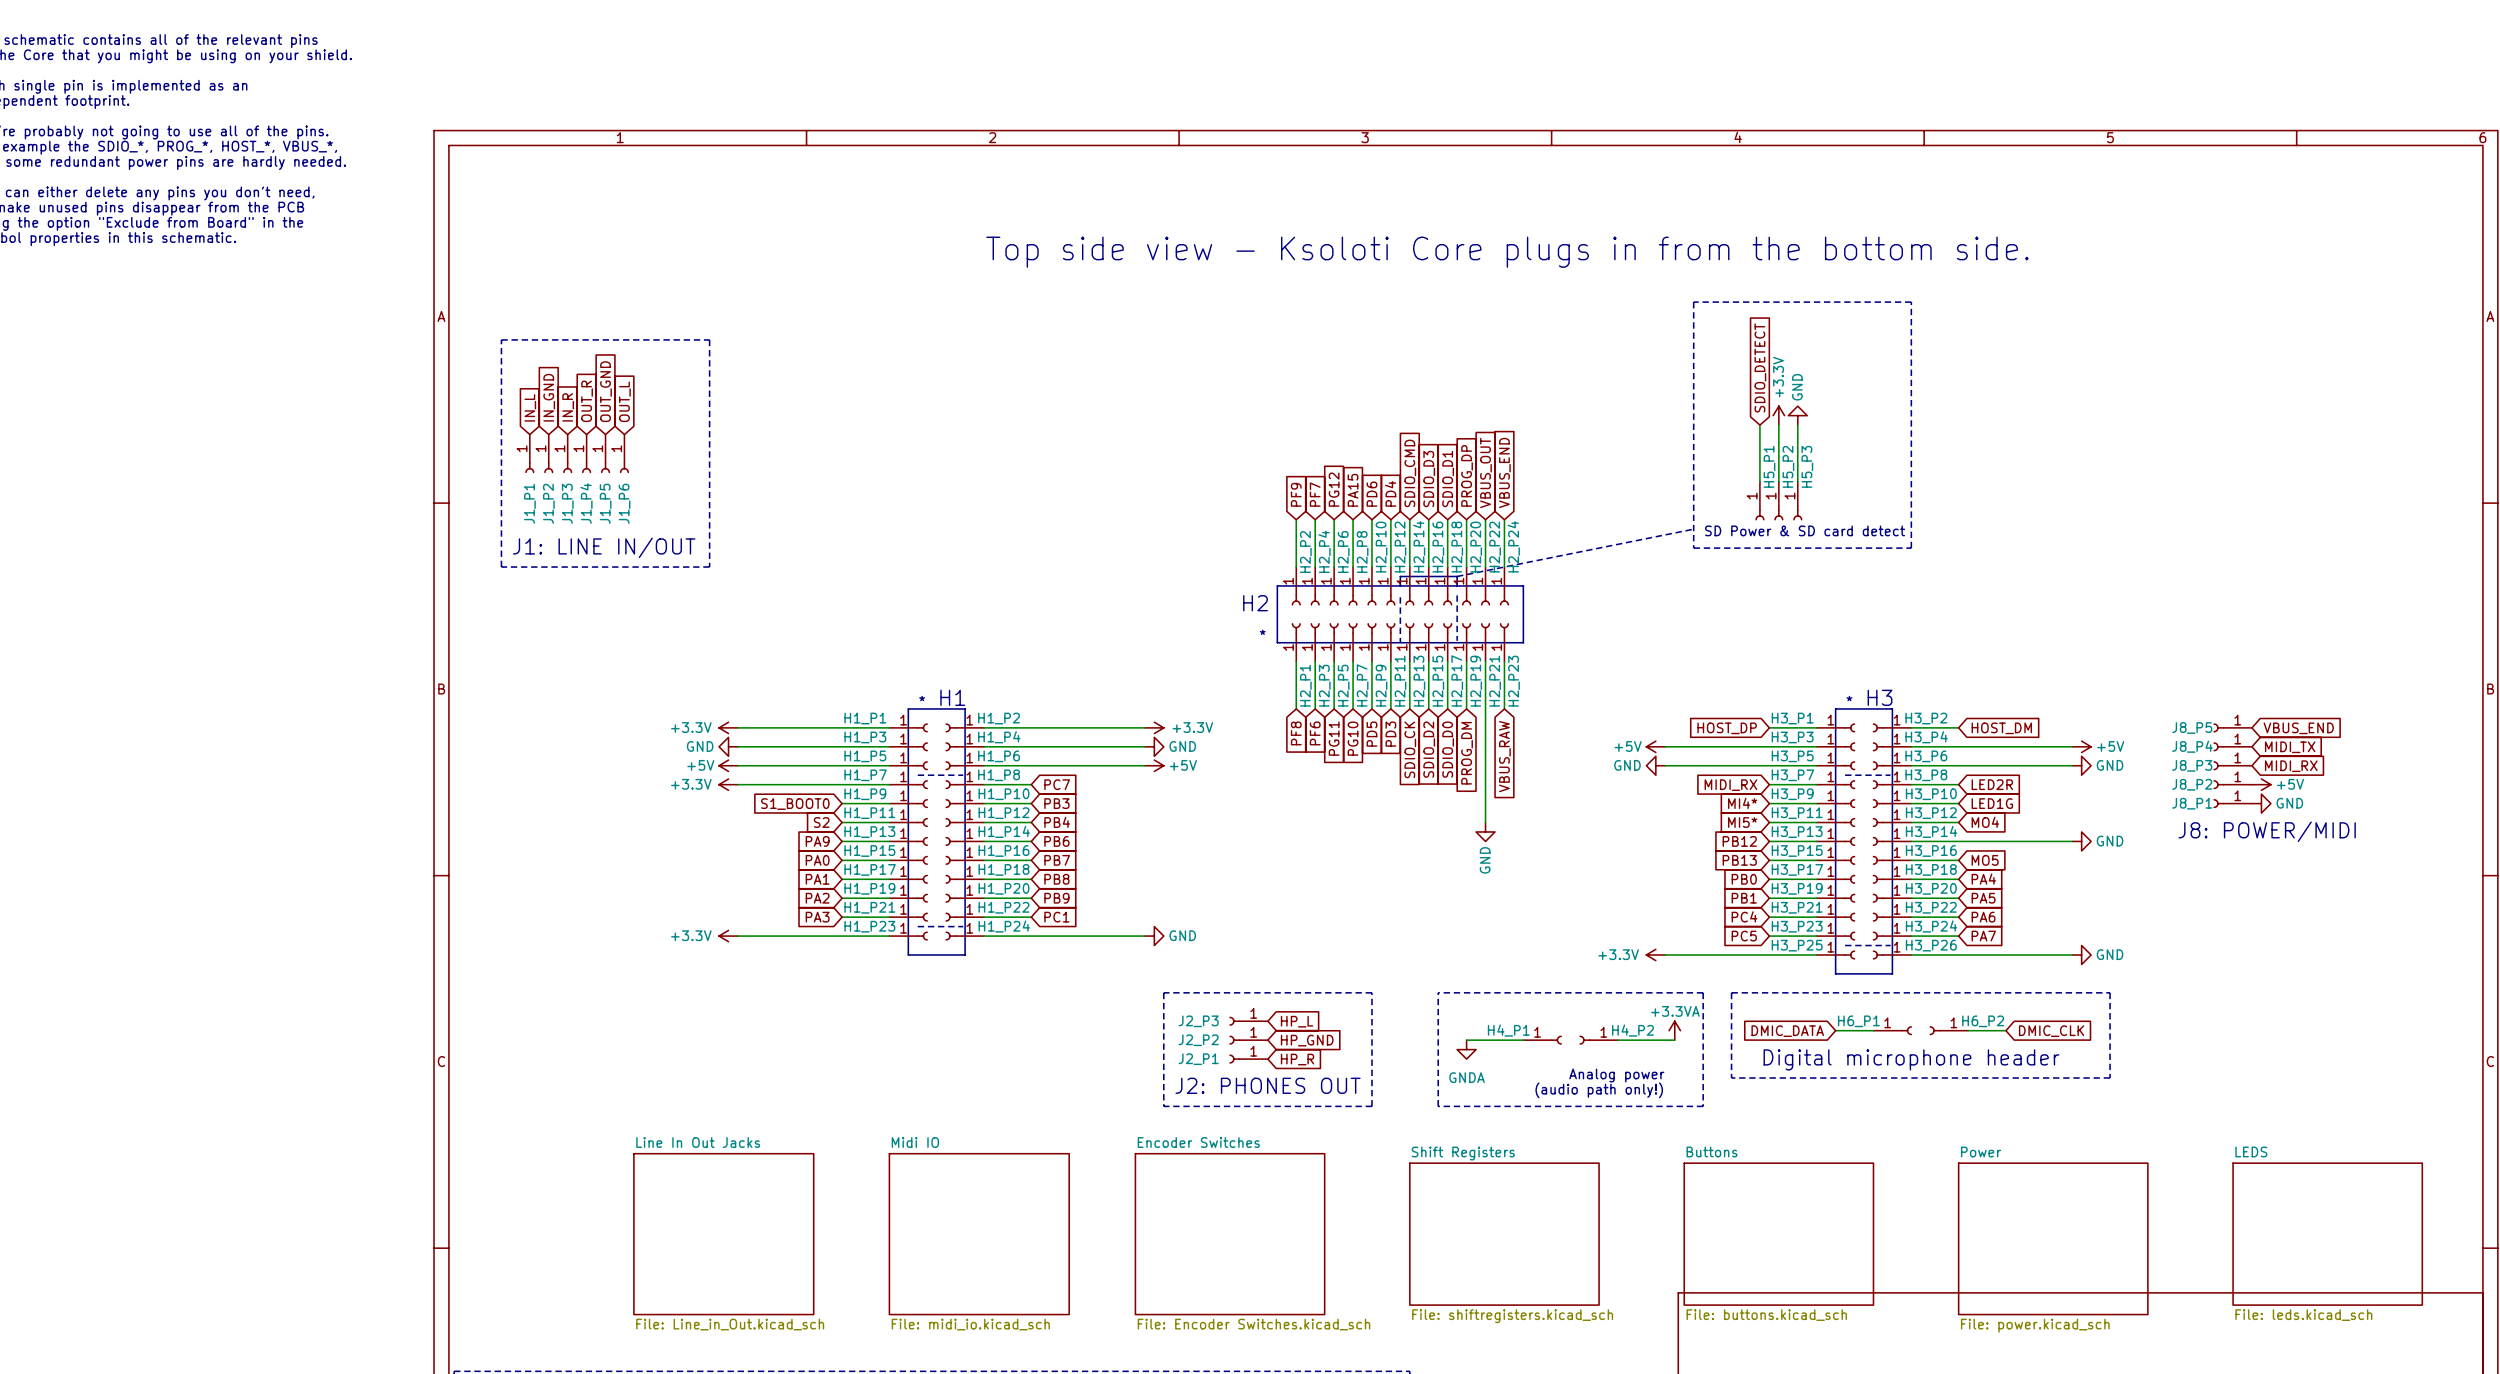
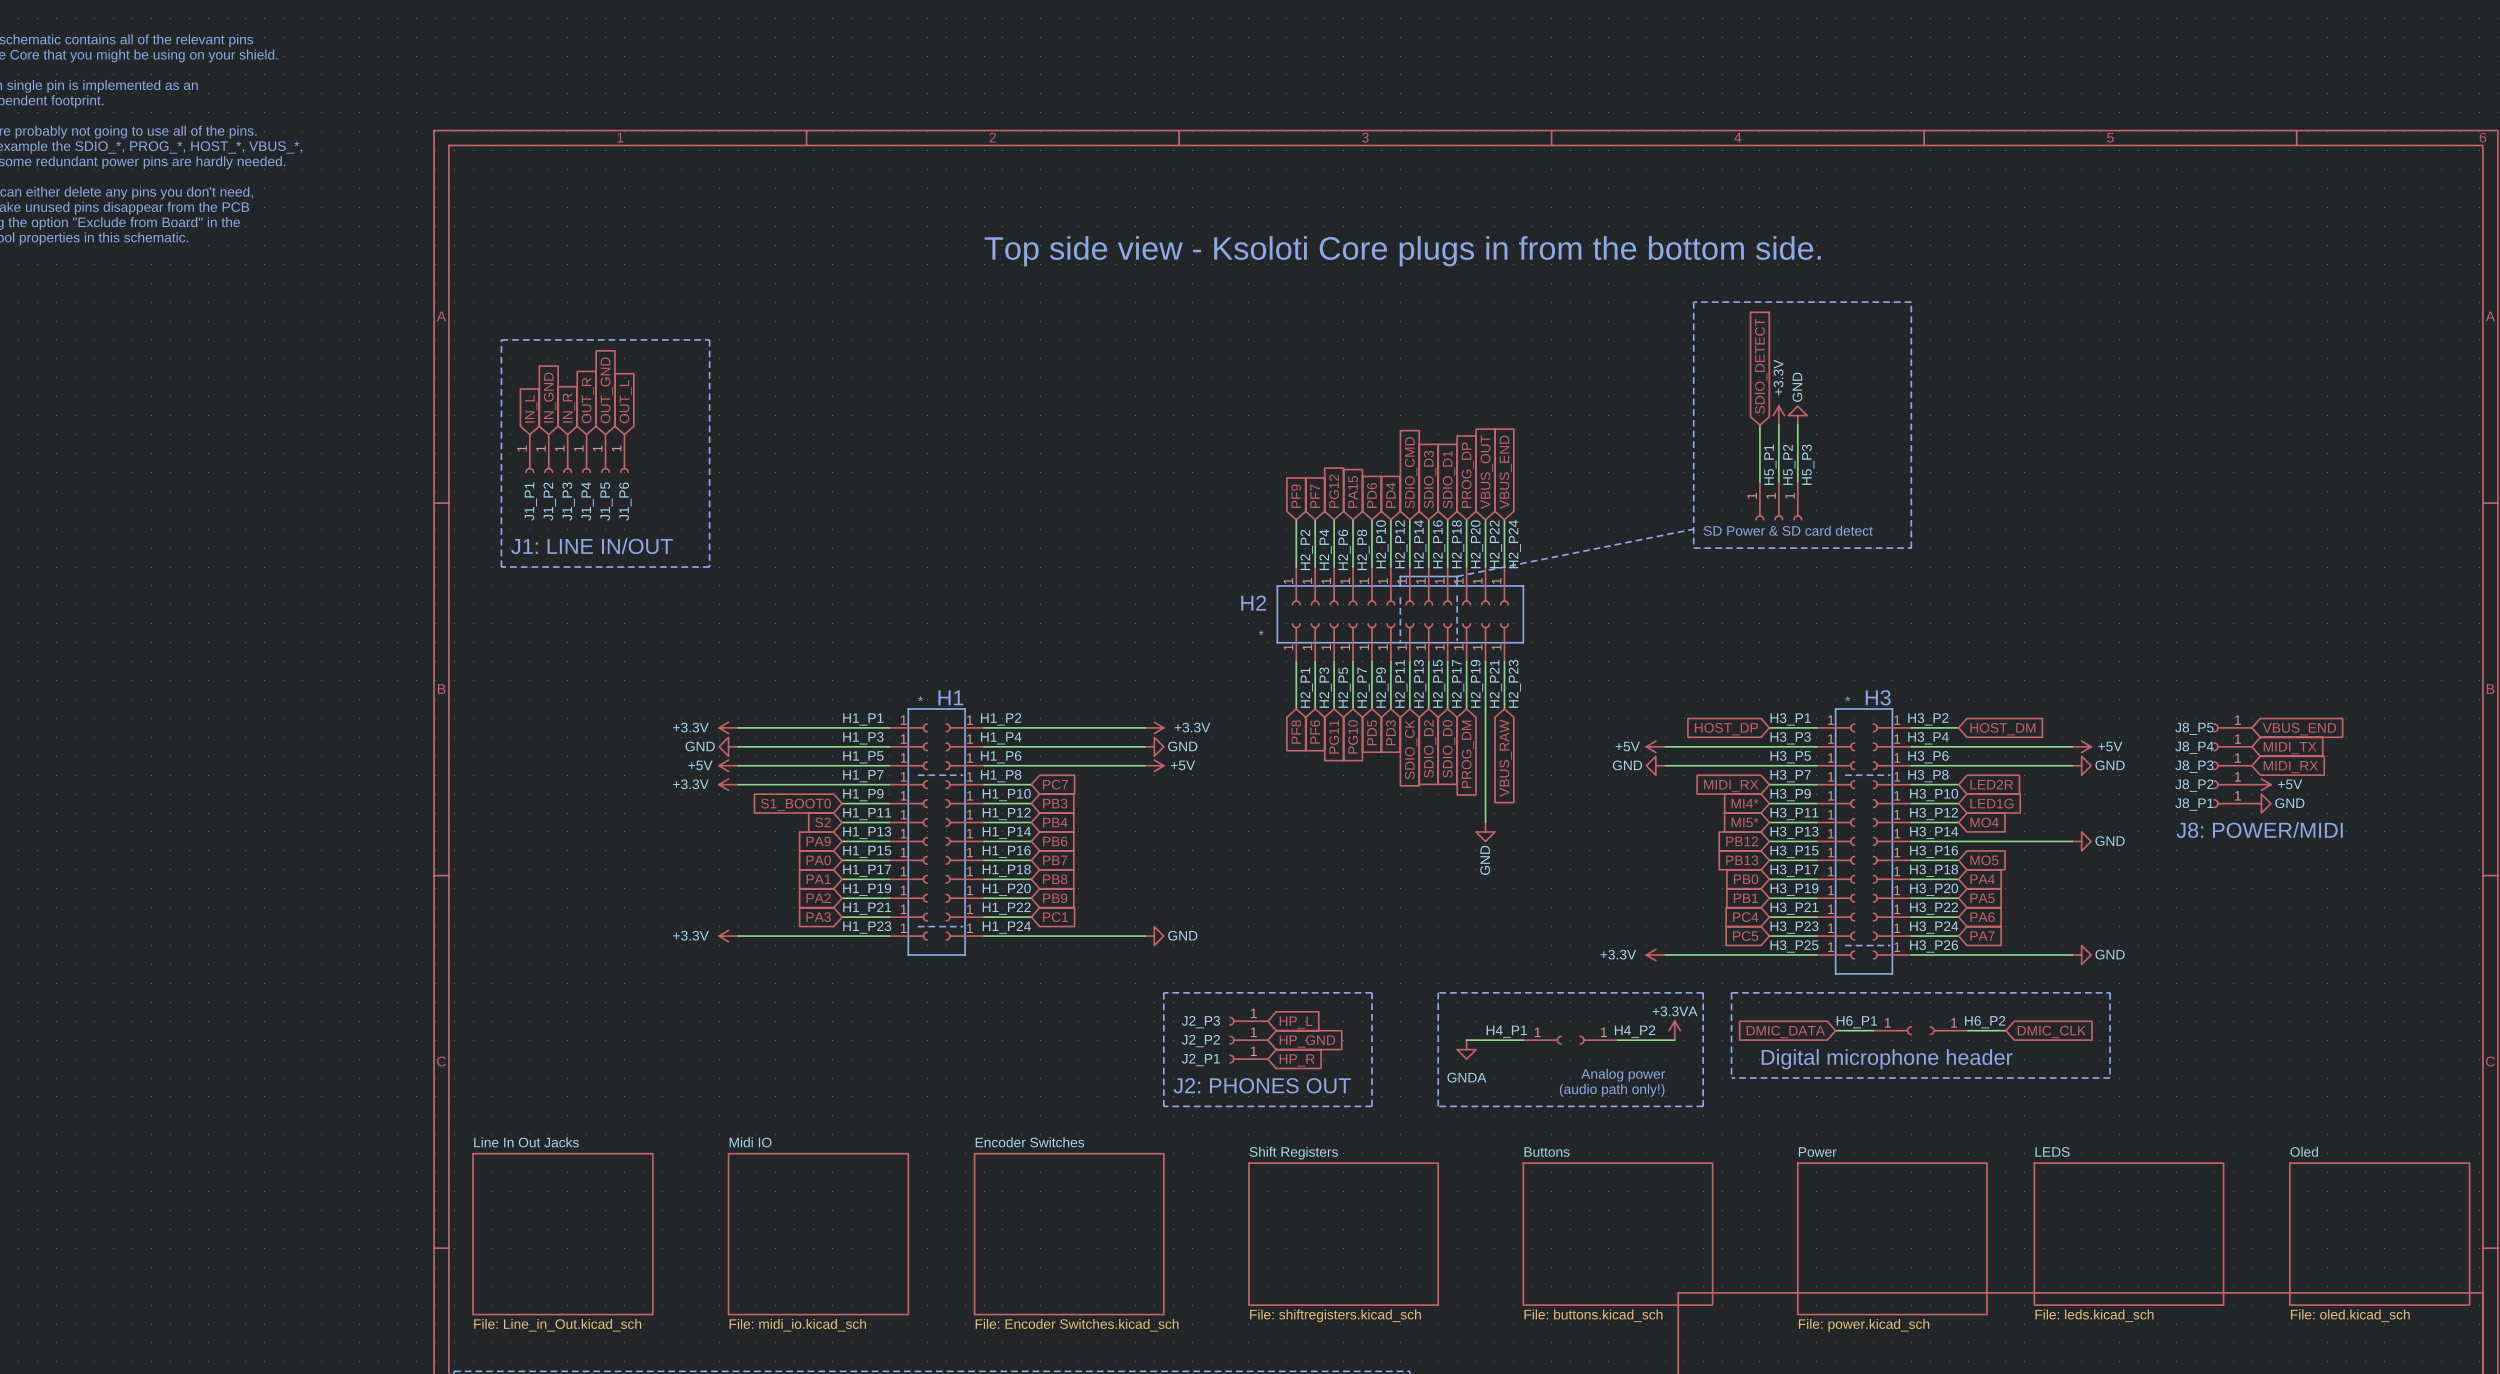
sheet Line In Out Jacks position: (723, 1234) -> (562, 1234)
sheet Midi IO position: (979, 1234) -> (818, 1234)
sheet Encoder Switches position: (1230, 1234) -> (1069, 1234)
sheet Shift Registers position: (1504, 1234) -> (1343, 1234)
sheet Buttons position: (1778, 1234) -> (1618, 1234)
sheet LEDS: none -> File: leds.kicad_sch (2128, 1234)
sheet LEDS: File: leds.kicad_sch (2327, 1234) -> none
sheet Oled: none -> File: oled.kicad_sch (2379, 1234)
sheet Power position: (2053, 1238) -> (1892, 1238)

